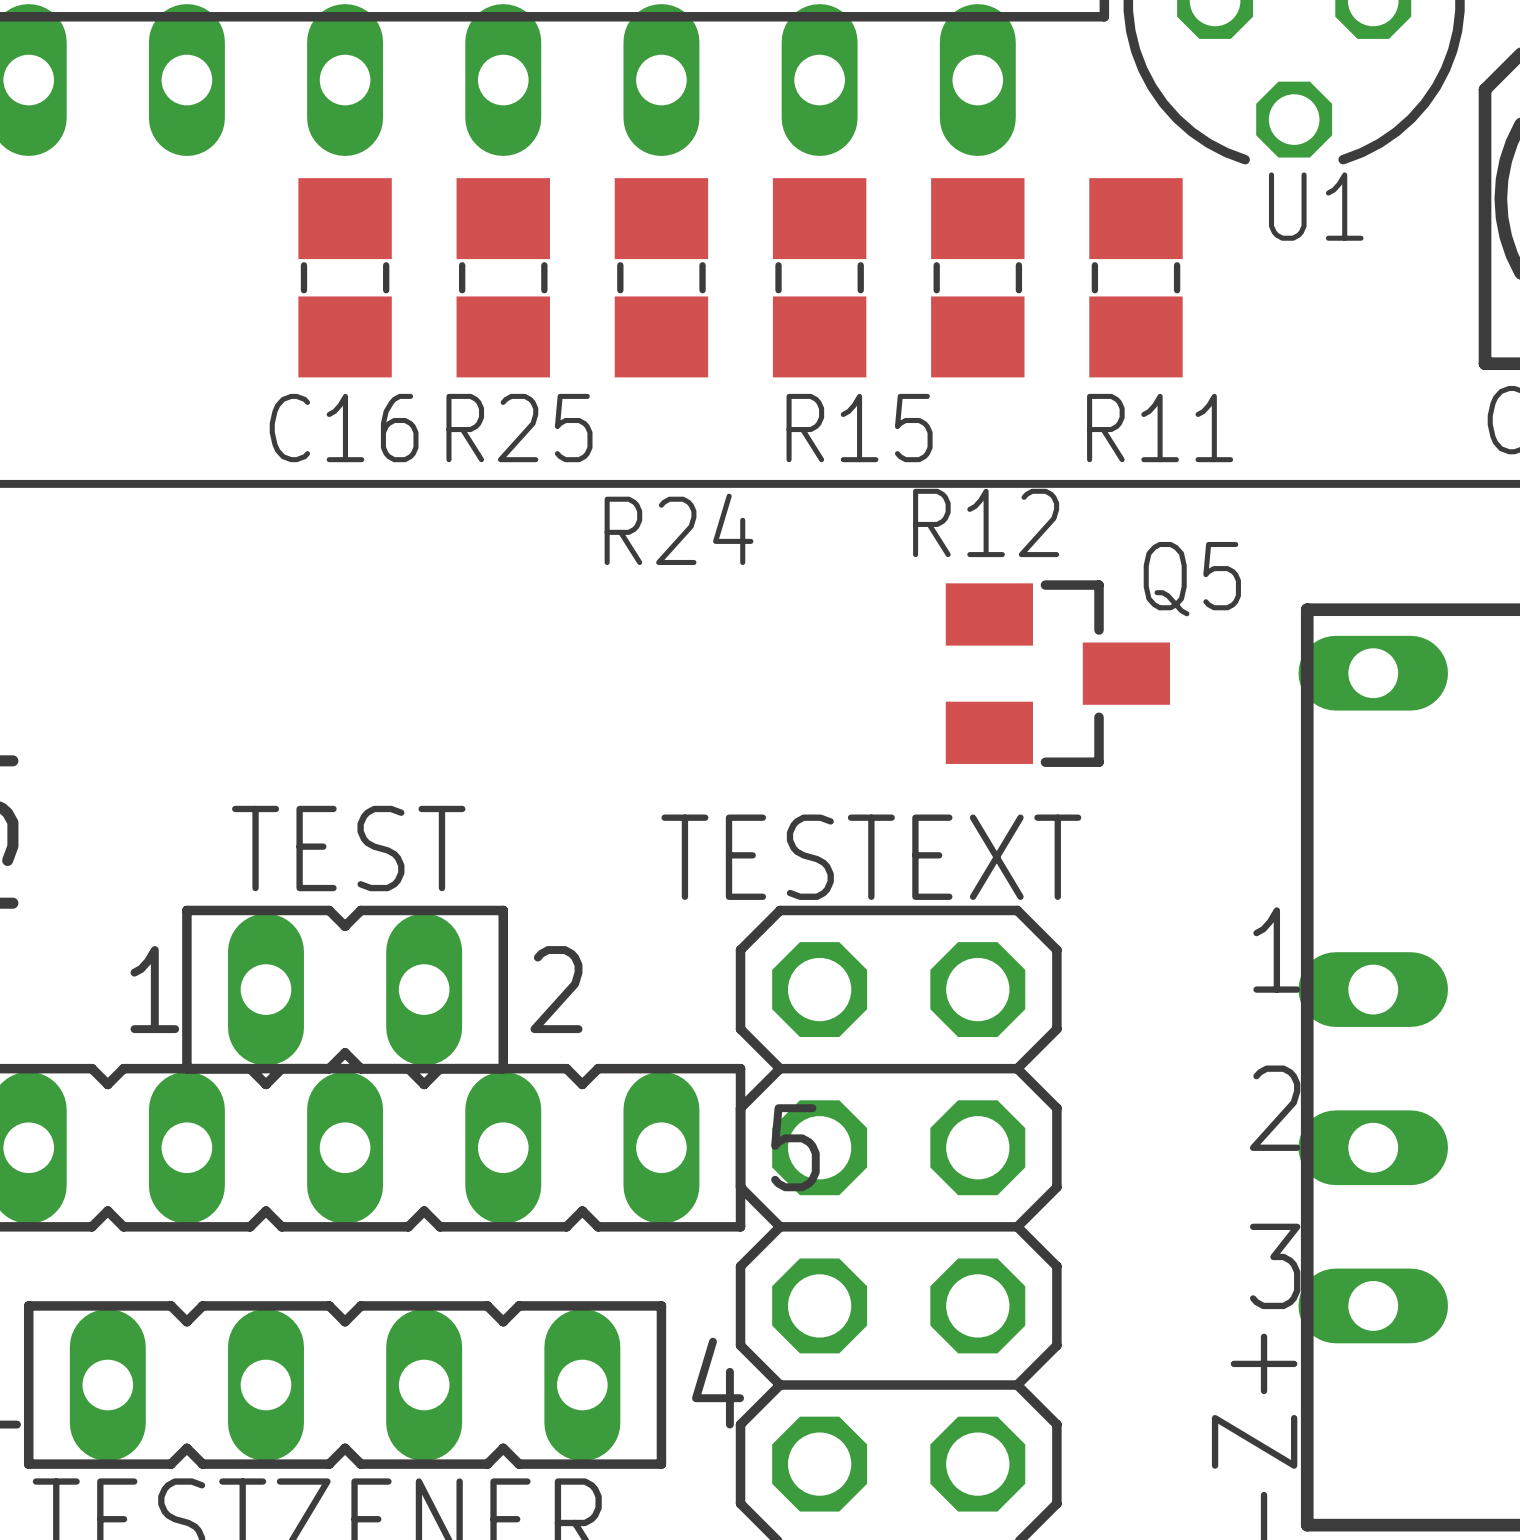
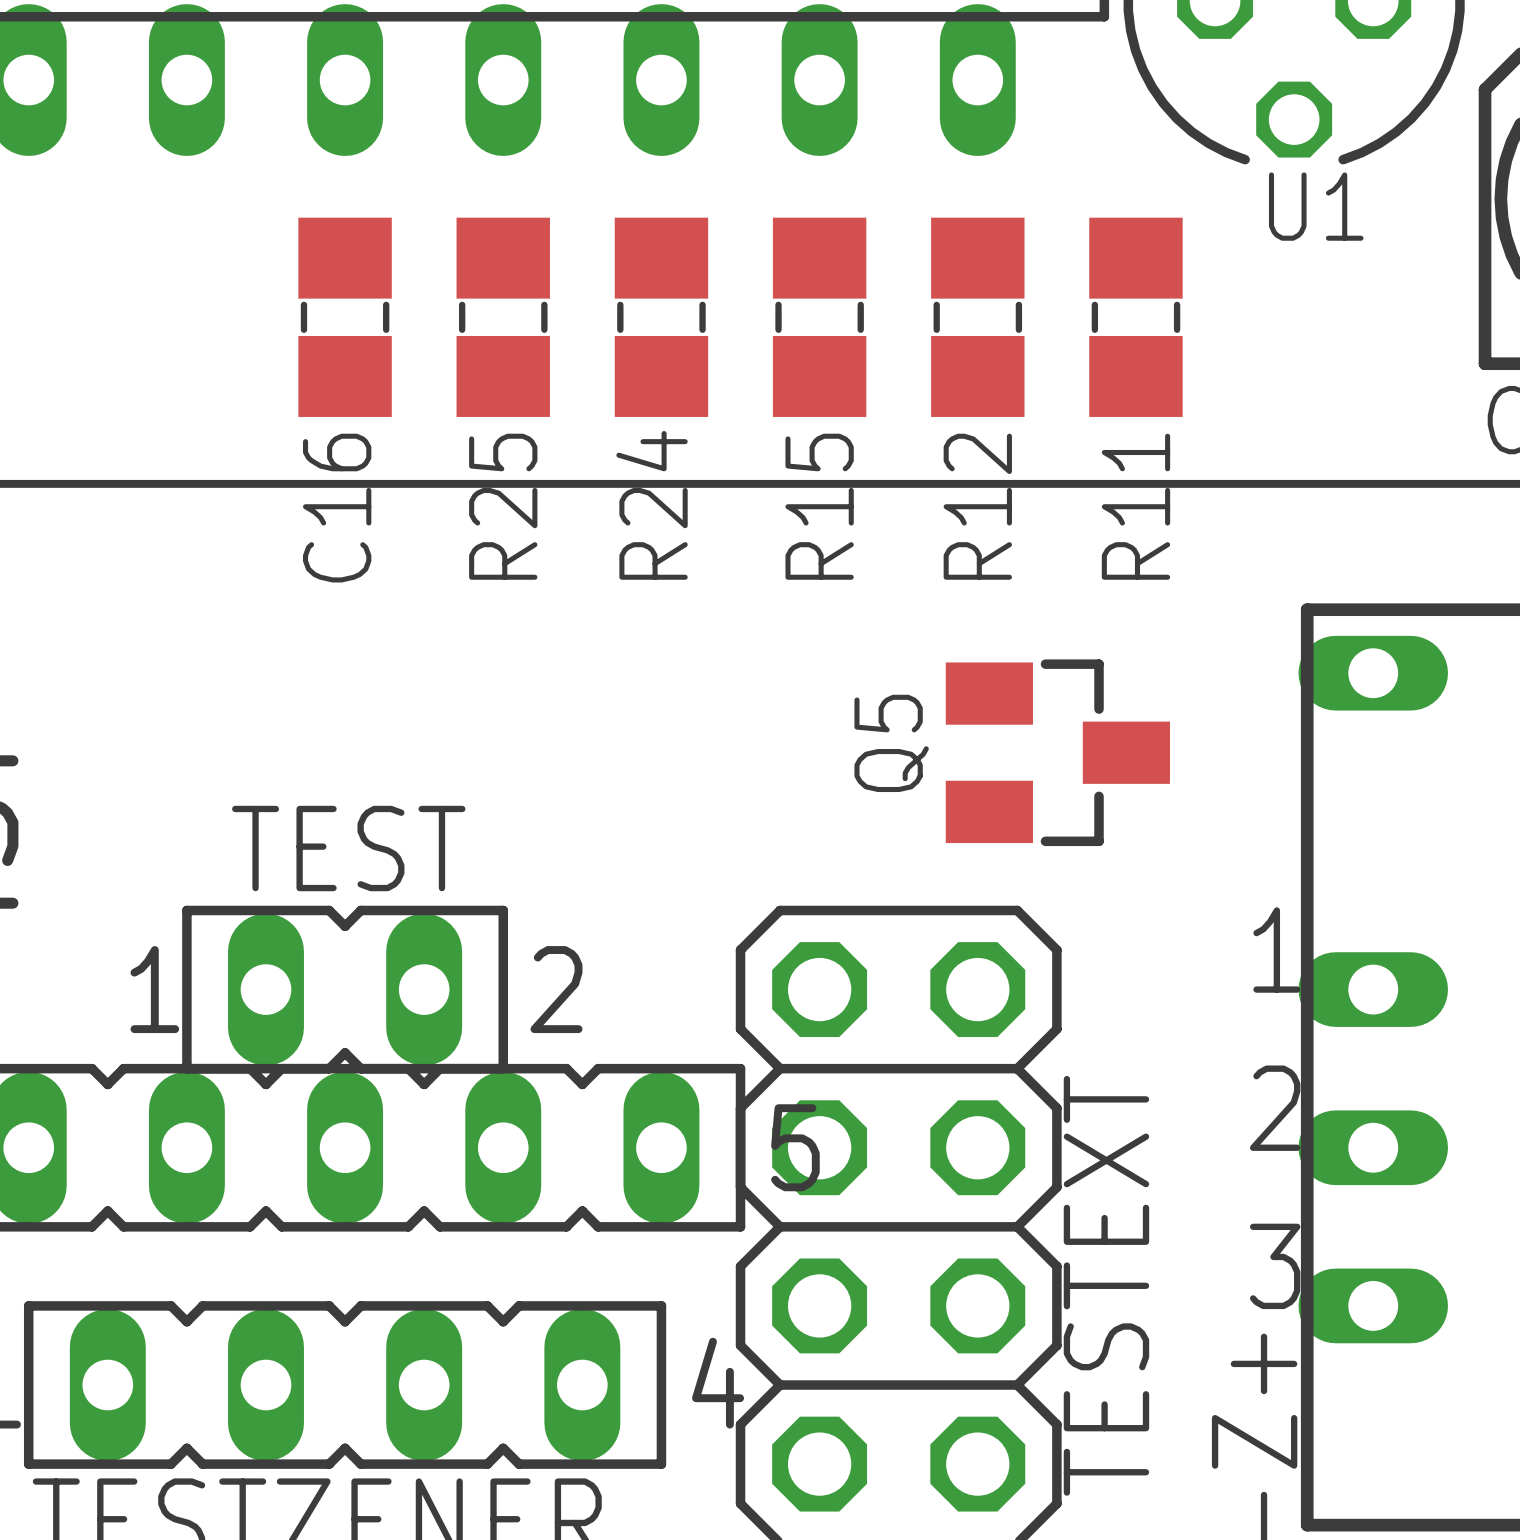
C16 position: (345, 277) -> (345, 317)
R25 position: (503, 277) -> (503, 317)
R24 position: (661, 277) -> (661, 317)
R15 position: (819, 277) -> (819, 317)
R12 position: (977, 277) -> (977, 317)
R11 position: (1135, 277) -> (1135, 317)
C16 name rotation: 0° (344, 428) -> 90° counterclockwise (337, 508)
R25 name rotation: 0° (519, 428) -> 90° counterclockwise (503, 506)
R15 name rotation: 0° (859, 428) -> 90° counterclockwise (819, 506)
R11 name rotation: 0° (1160, 428) -> 90° counterclockwise (1135, 506)
R12 name rotation: 0° (986, 522) -> 90° counterclockwise (977, 506)
R24 name rotation: 0° (679, 529) -> 90° counterclockwise (652, 505)
Q5 name rotation: 0° (1192, 579) -> 90° counterclockwise (891, 743)
Q5 name position: Q5 (1192, 579) -> Q5 (891, 743)
Q5 position: (1057, 673) -> (1057, 752)
part value rotation: 0° (871, 857) -> 90° counterclockwise (1106, 1285)

